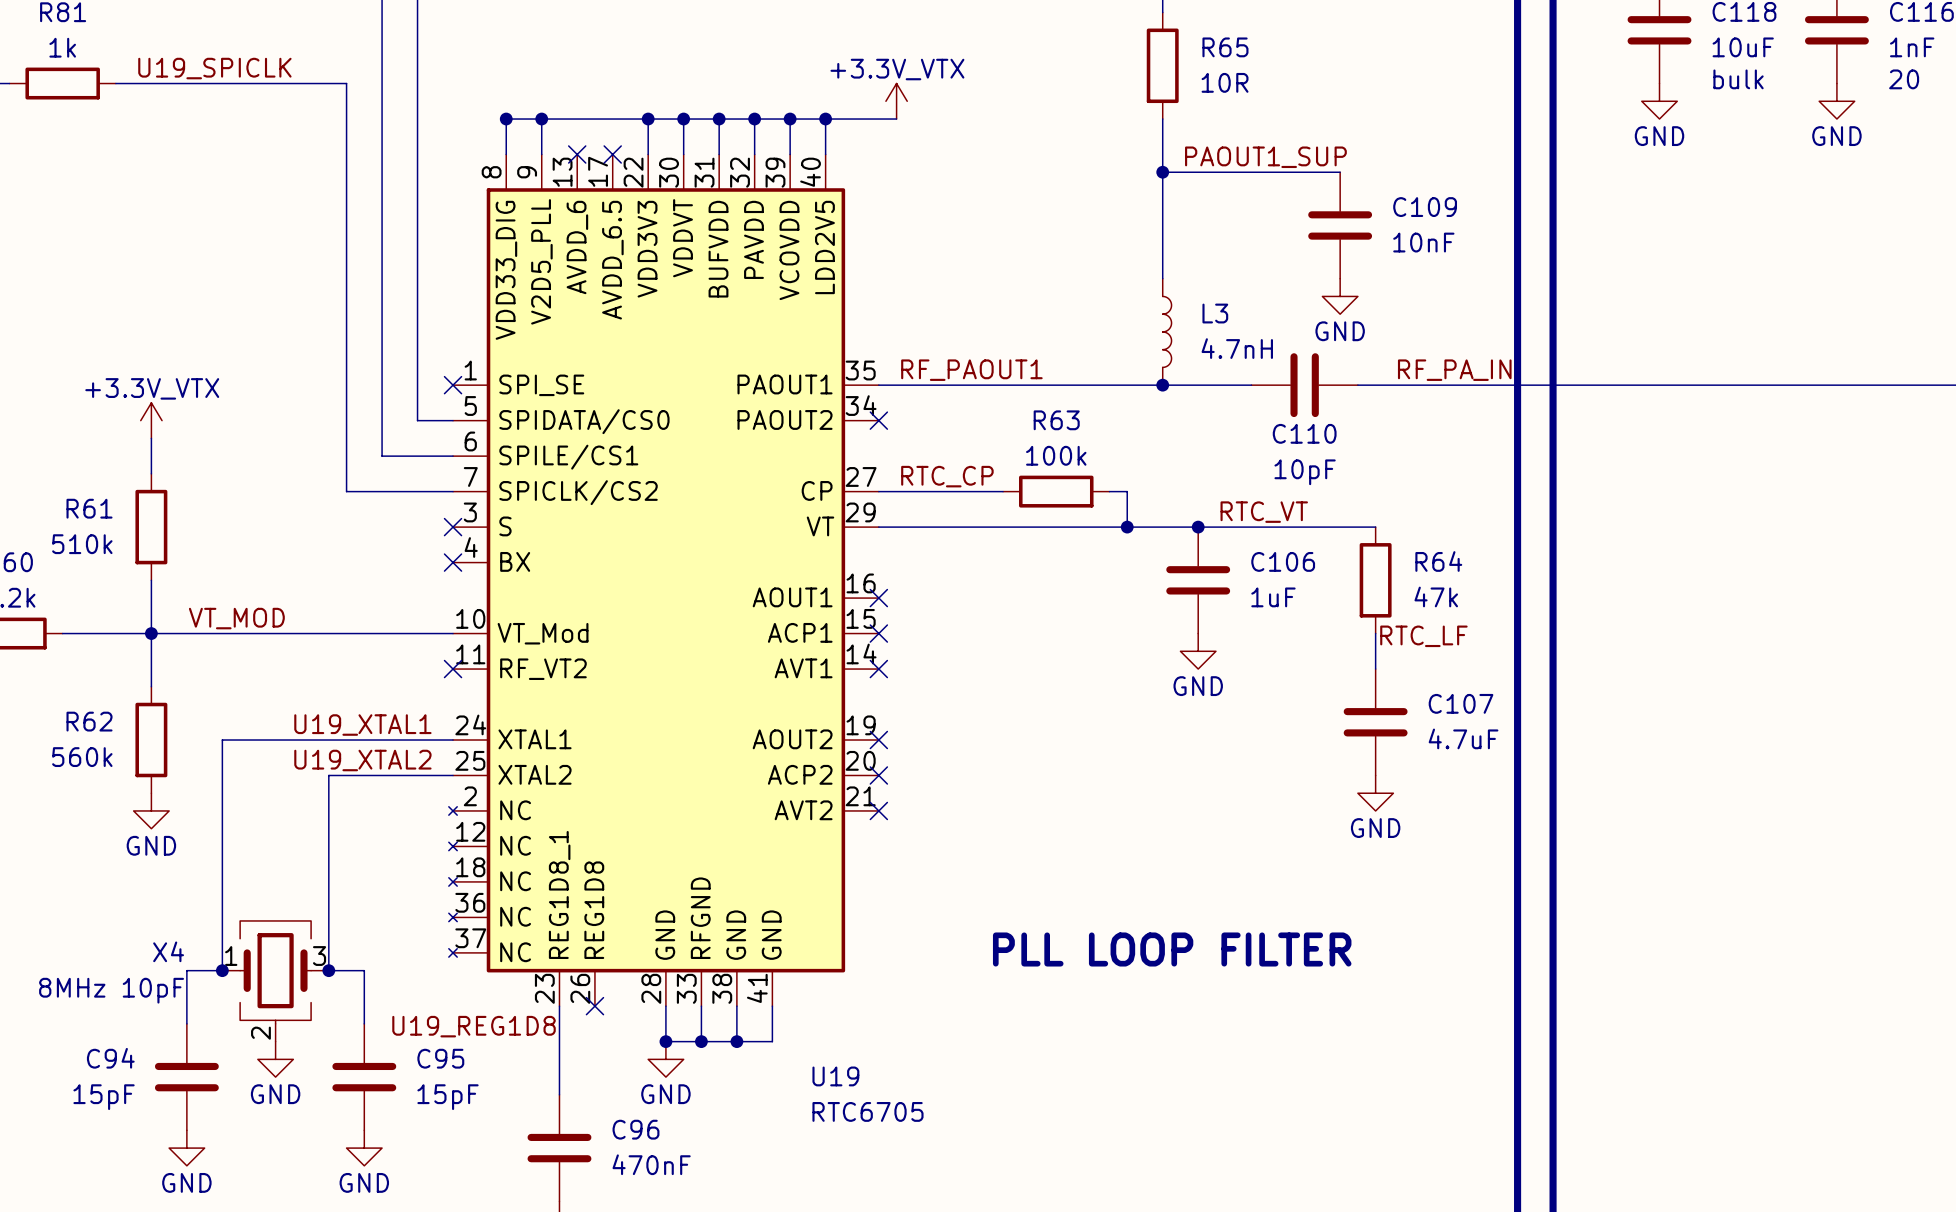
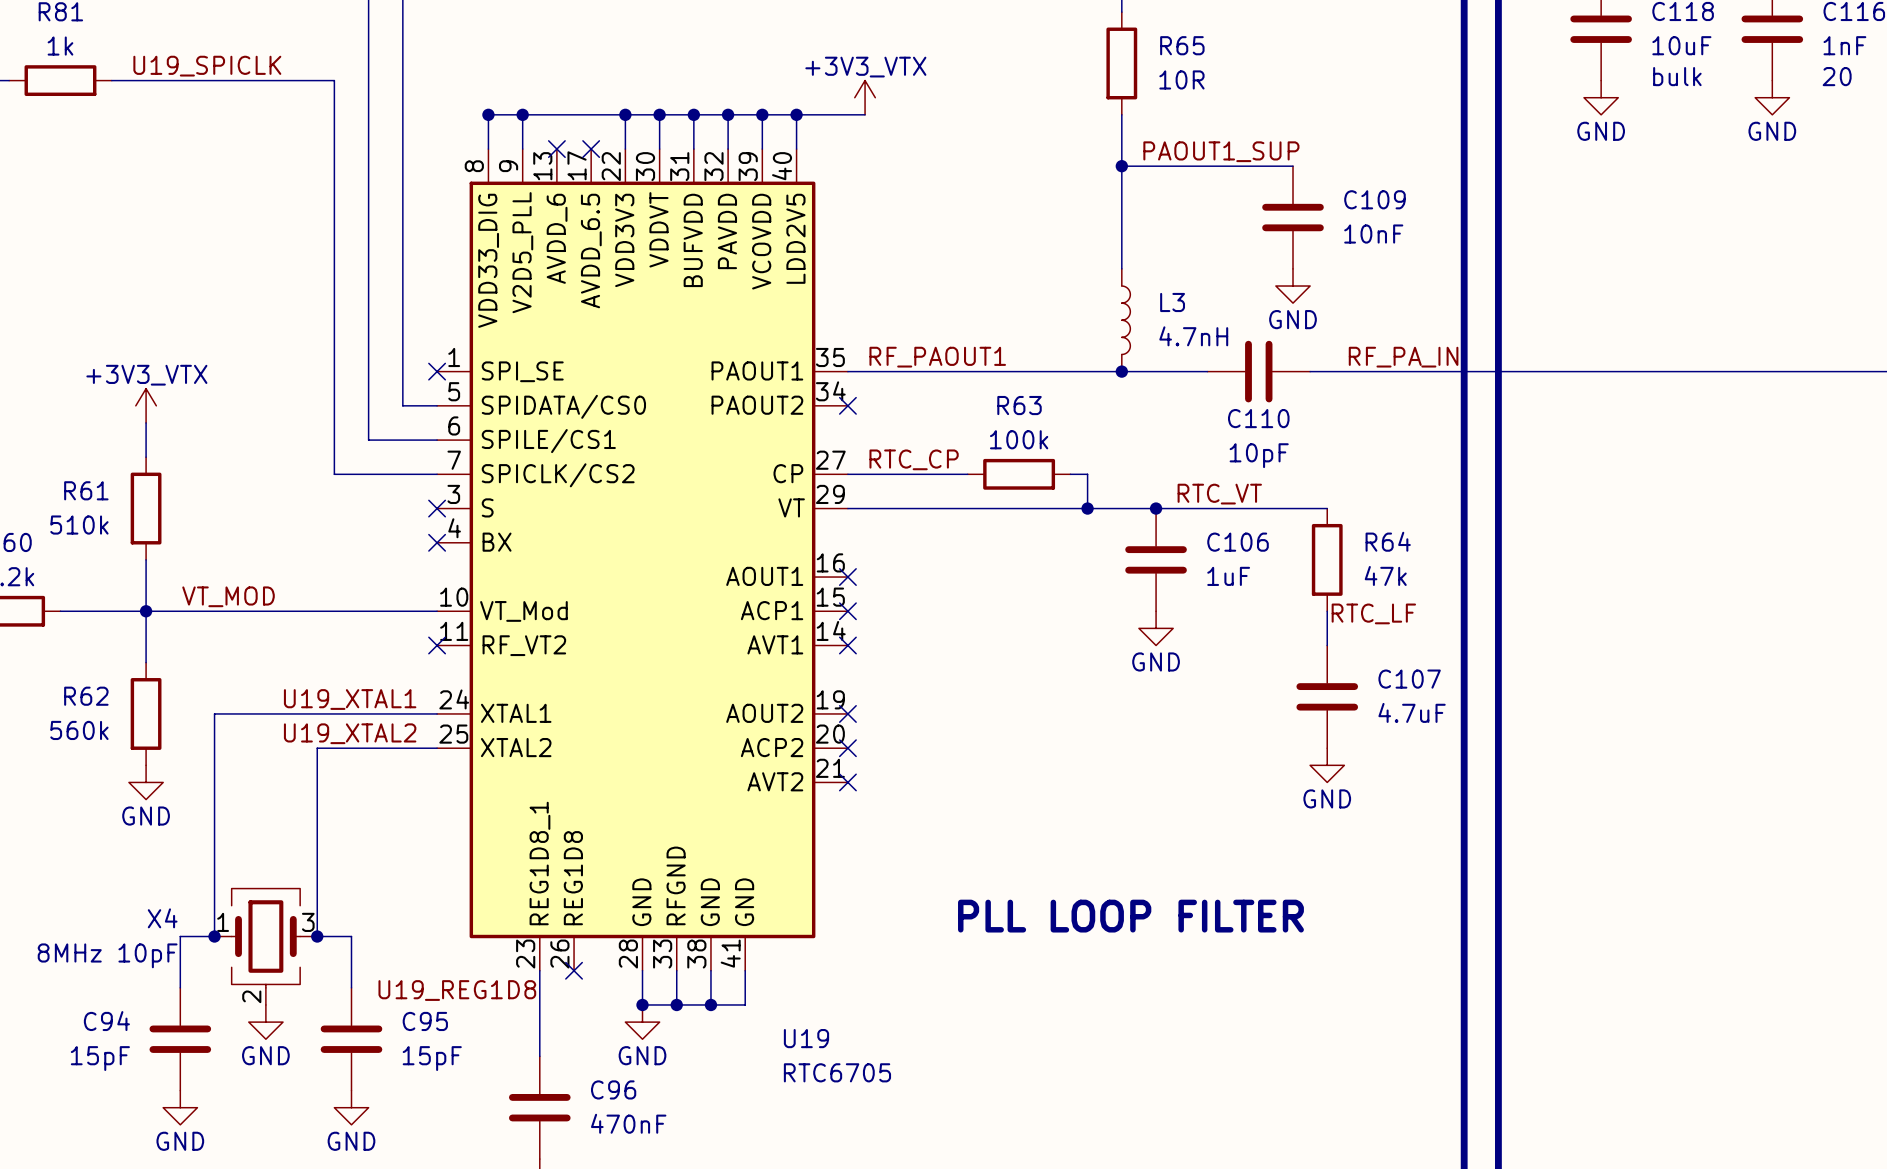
power symbol: +3.3V_VTX (896, 101) -> +3V3_VTX (865, 97)
U19 symbol: [448, 154, 879, 1007] -> [437, 149, 848, 971]
power symbol: +3.3V_VTX (151, 420) -> +3V3_VTX (146, 405)

